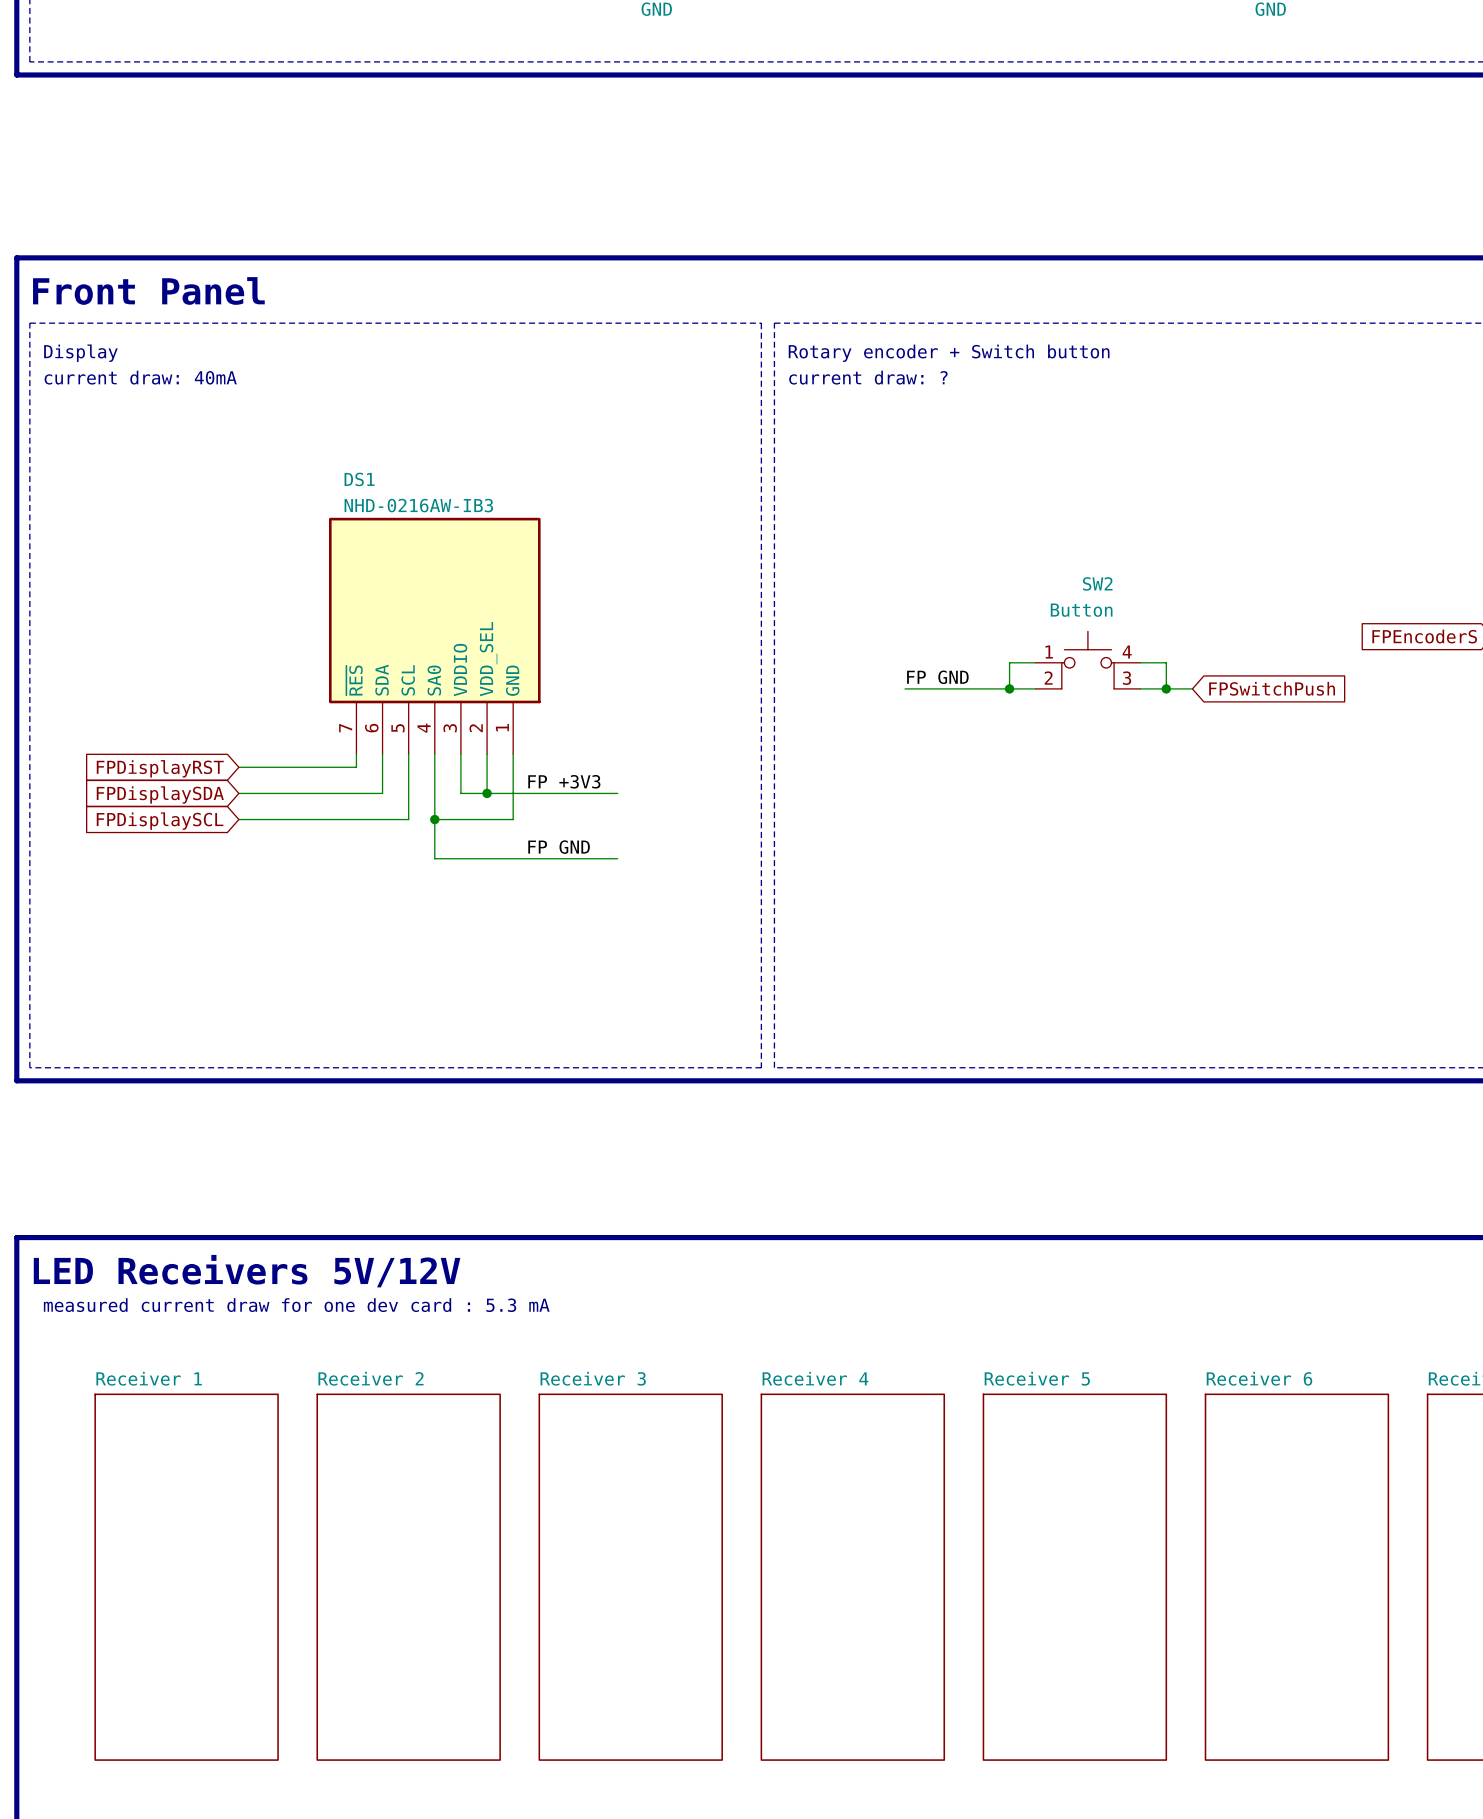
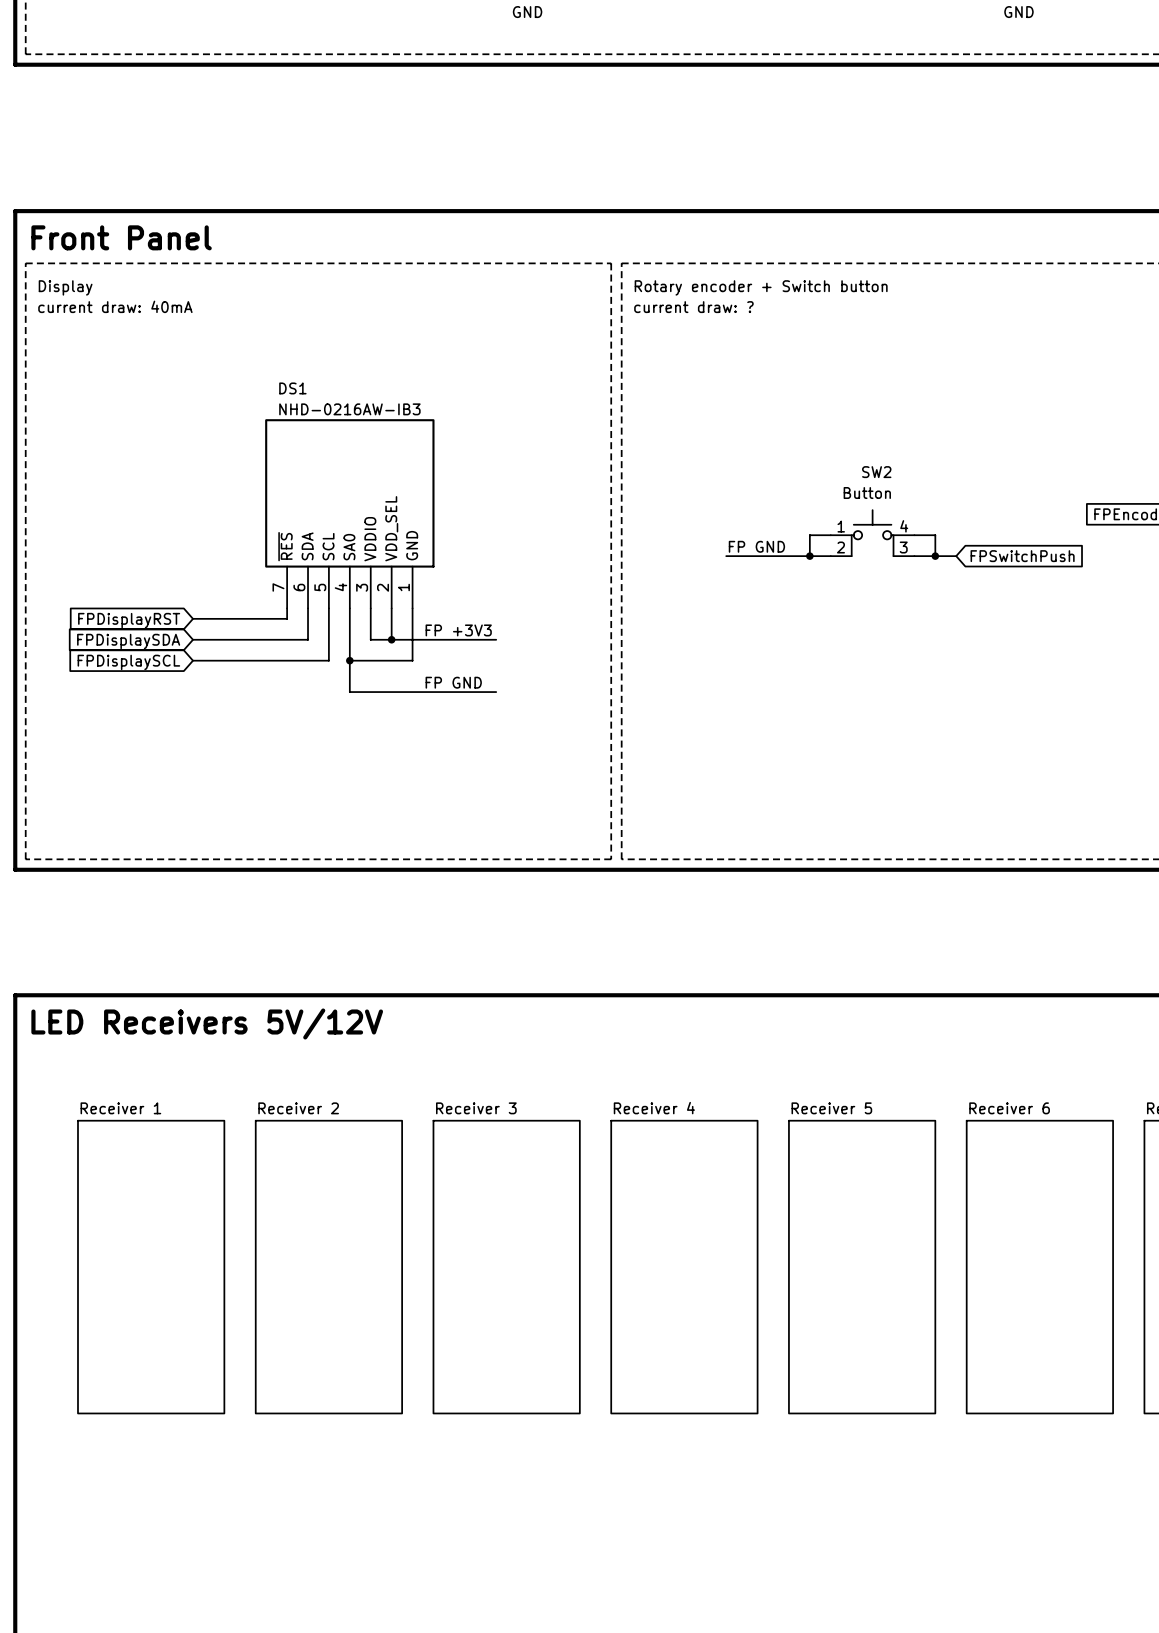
text: measured current draw for one dev card : 5.3 mA (296, 1305) -> none

